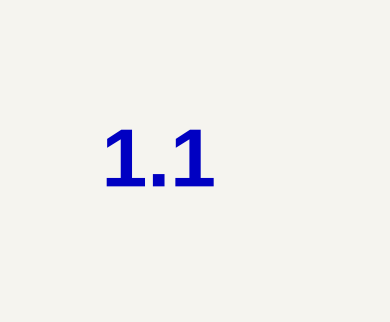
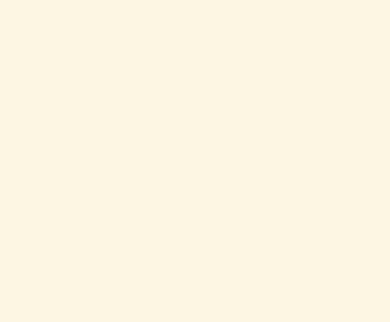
text: 1.1 (160, 158) -> none

